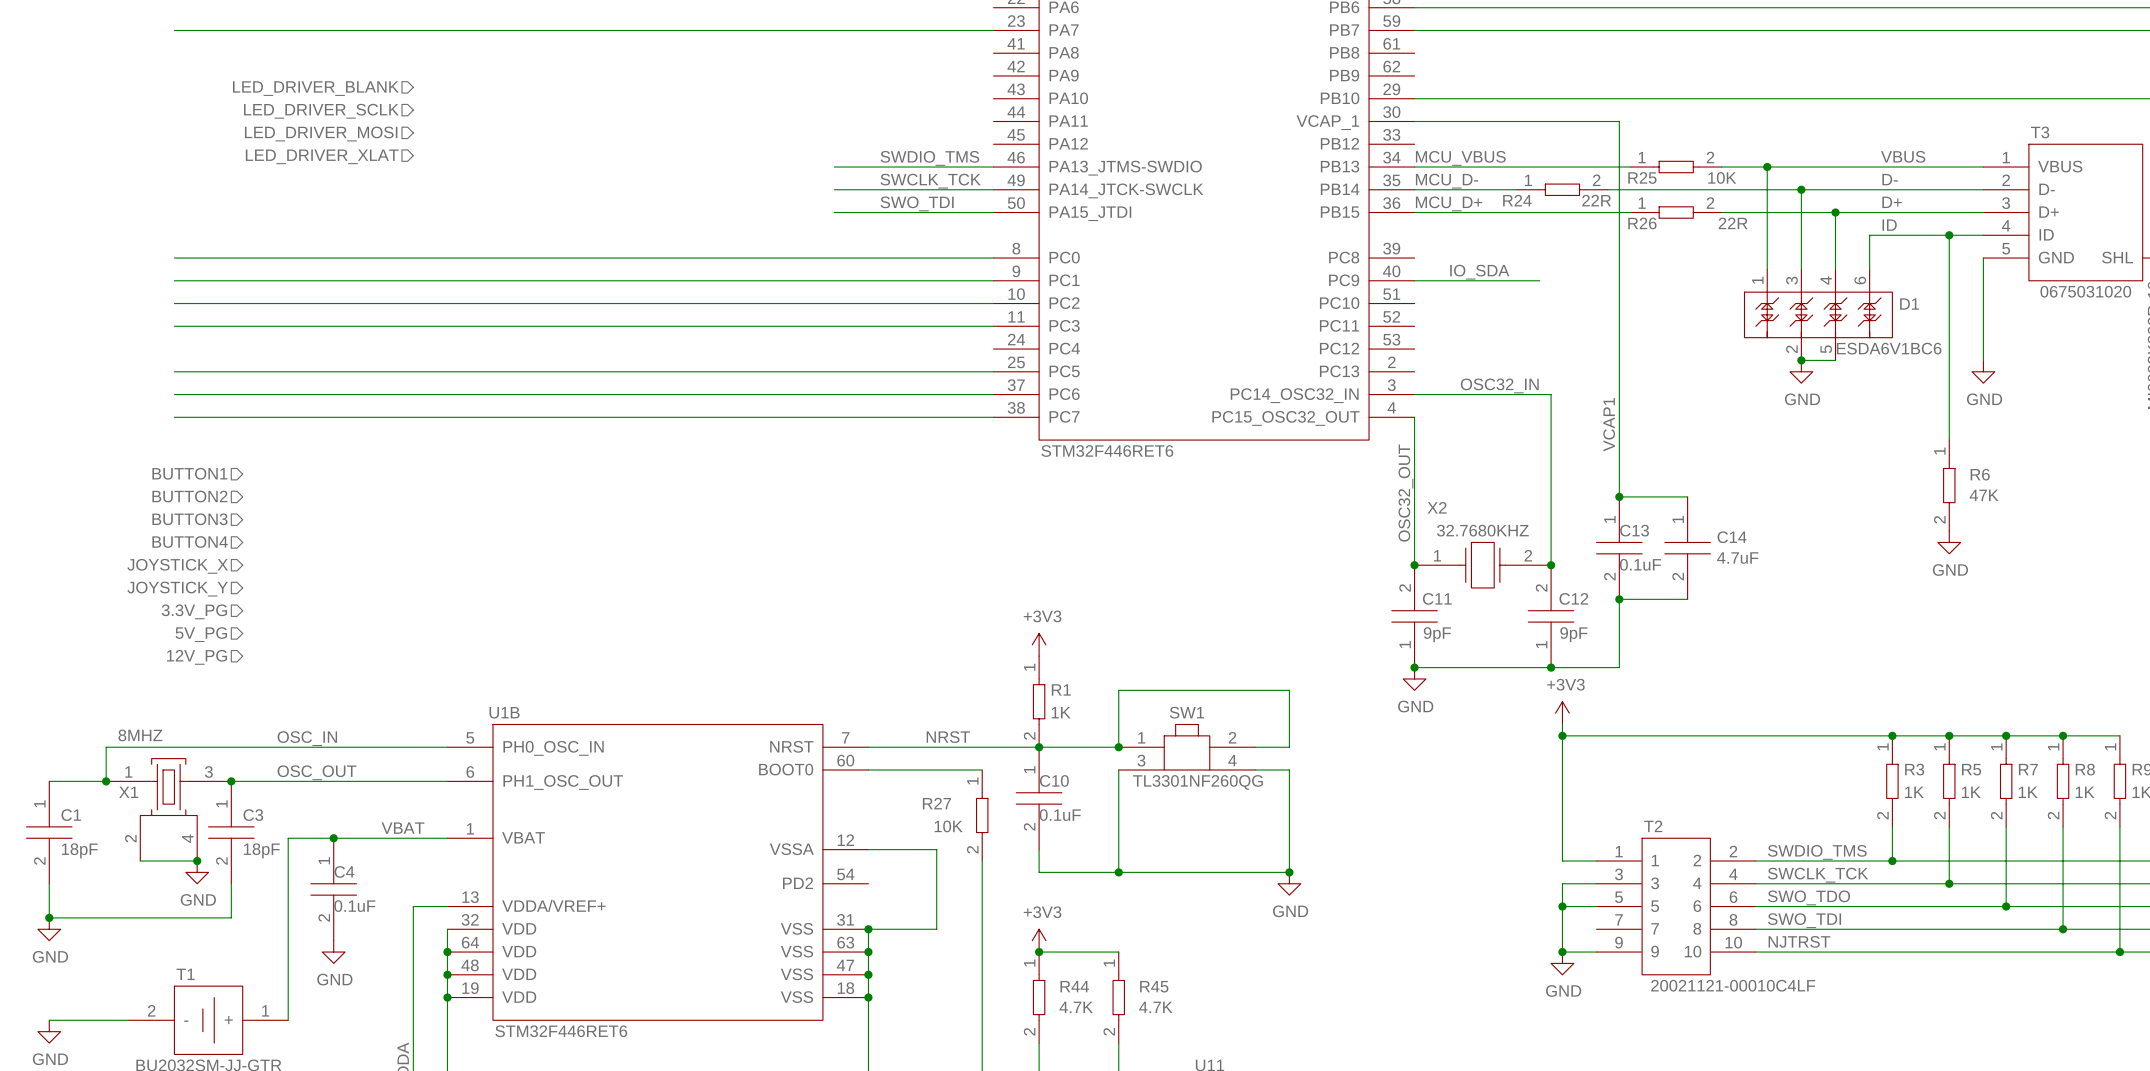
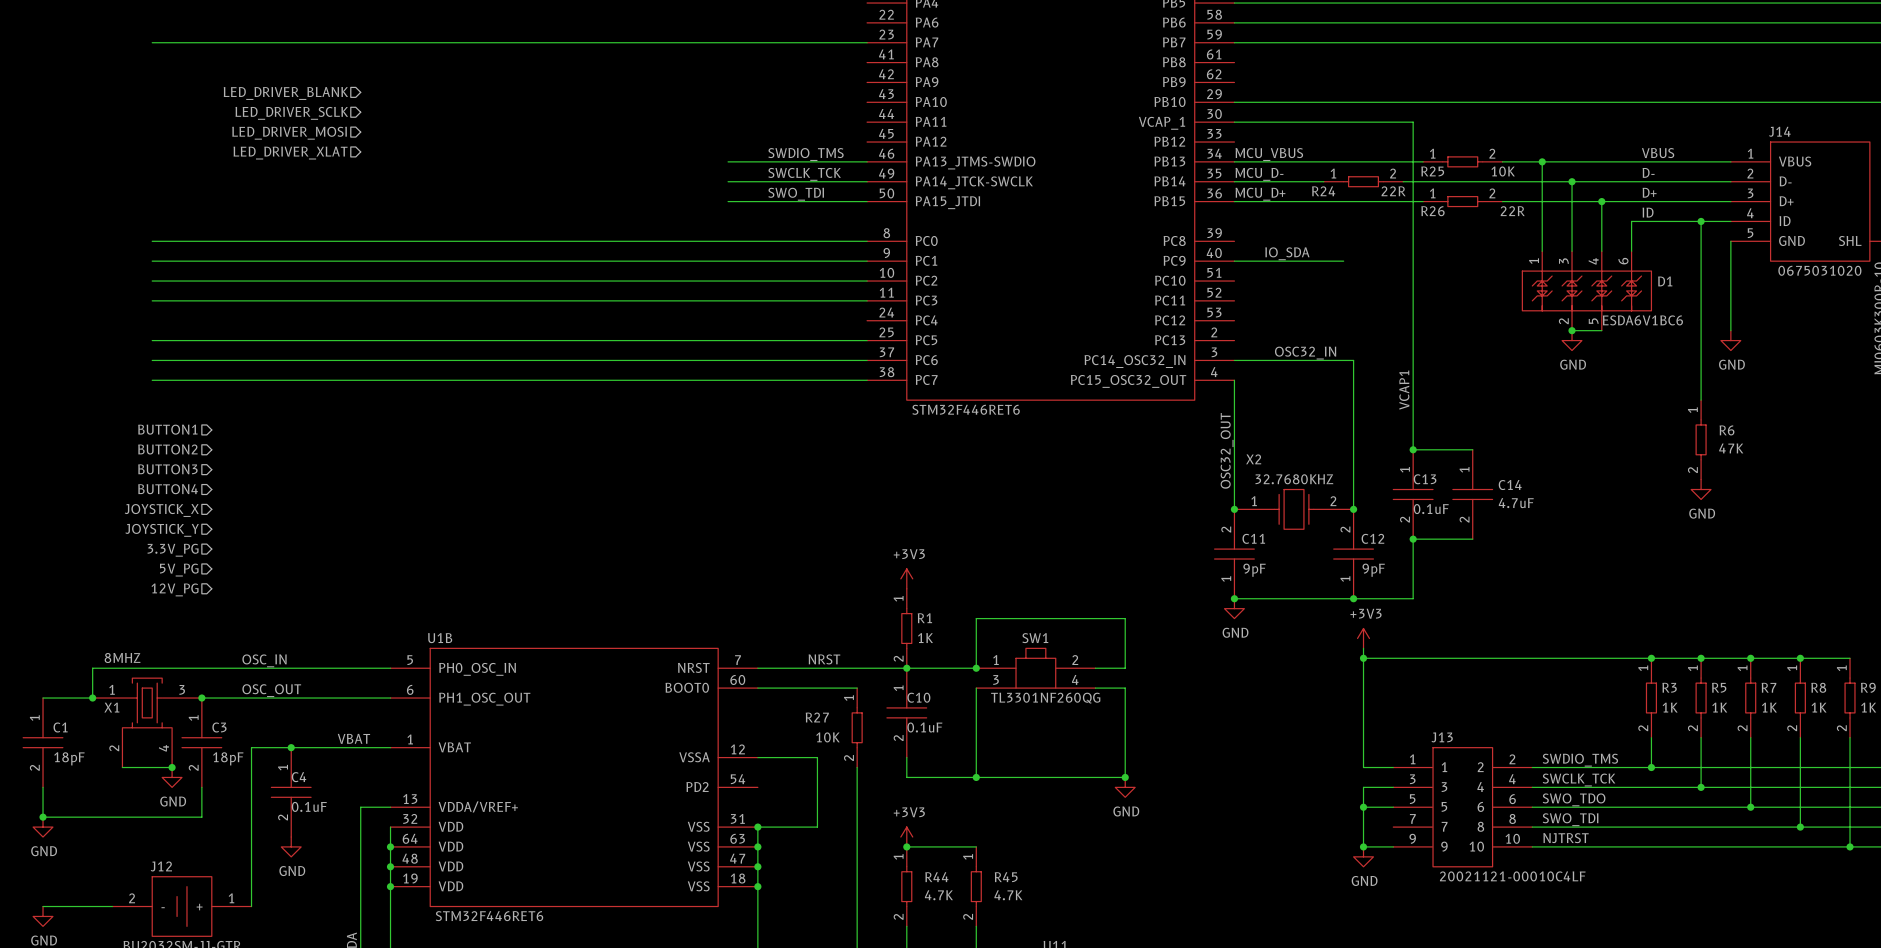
T3 name: T3 (2040, 132) -> J14 (1779, 131)
T2 name: T2 (1653, 826) -> J13 (1442, 737)
T1 name: T1 (185, 974) -> J12 (161, 866)

